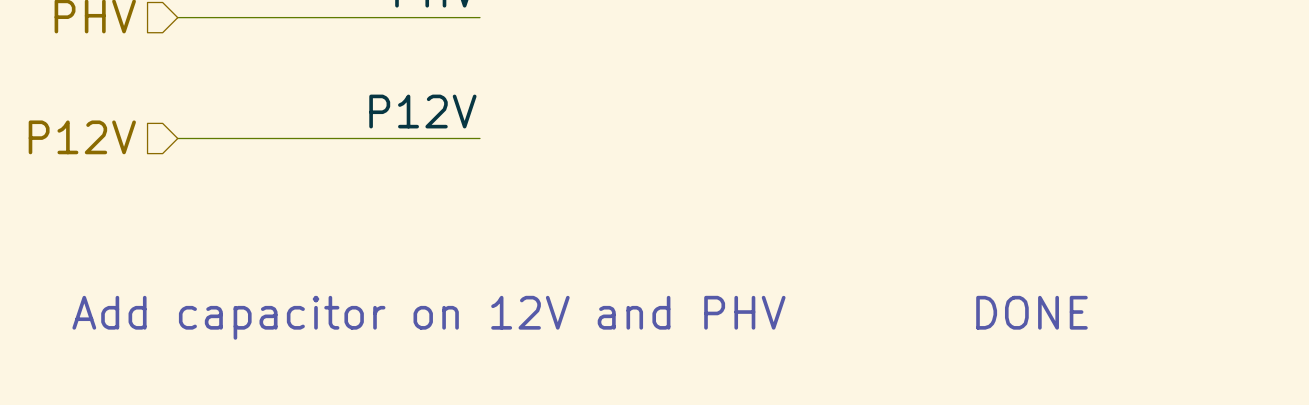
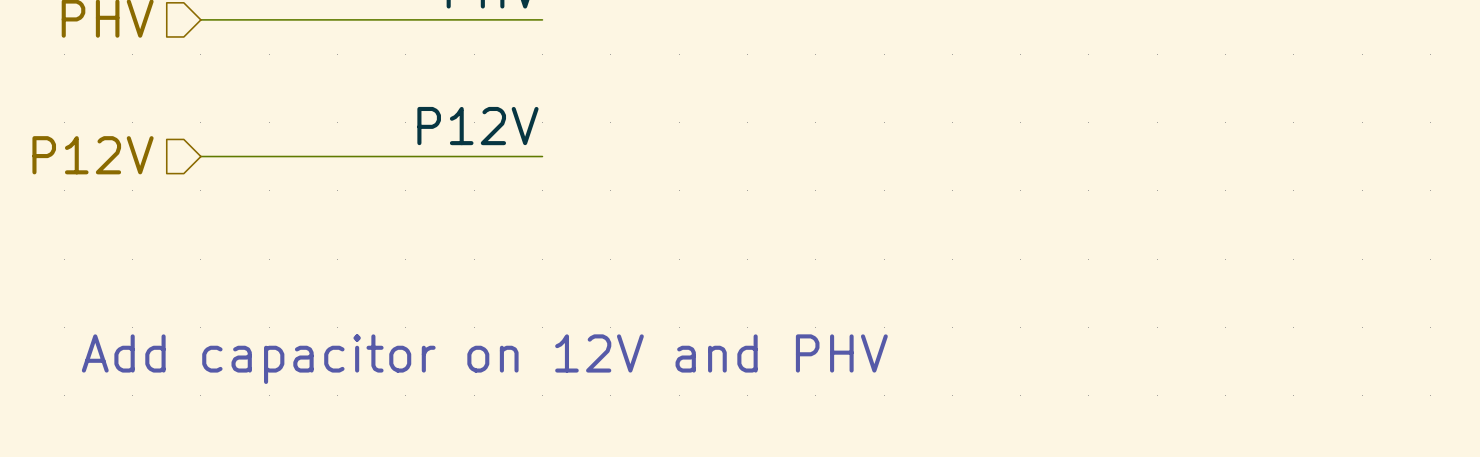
text: Add capacitor on 12V and PHV DONE (580, 317) -> Add capacitor on 12V and PHV (484, 359)

